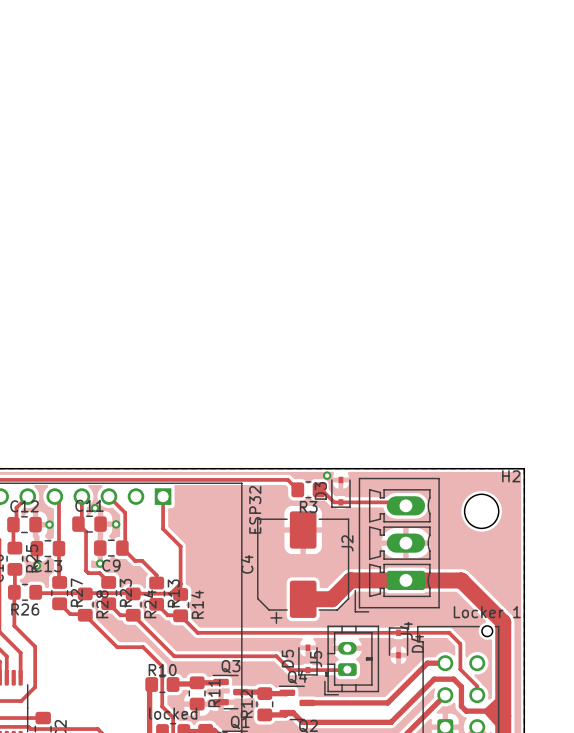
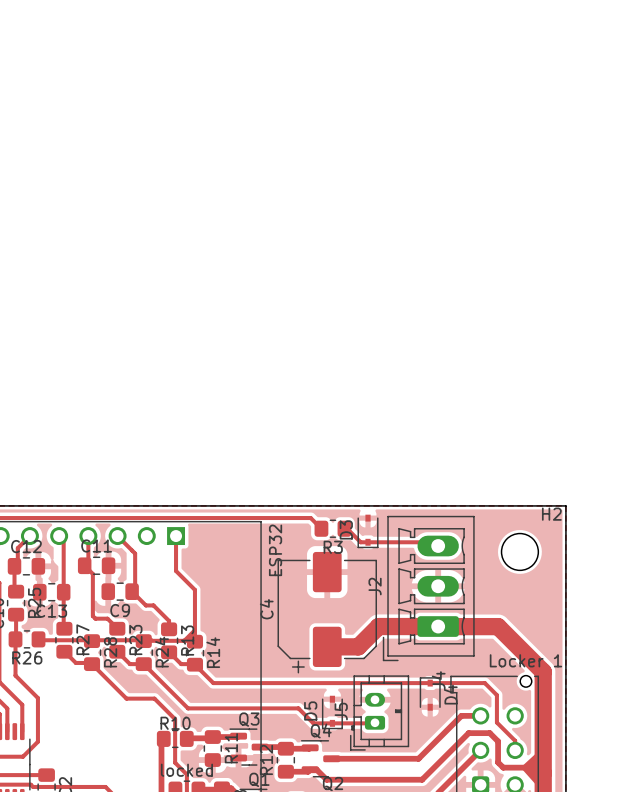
via: (327, 475) -> none
via: (95, 508) -> none
via: (49, 524) -> none
via: (116, 524) -> none
via: (100, 563) -> none
via: (37, 565) -> none

